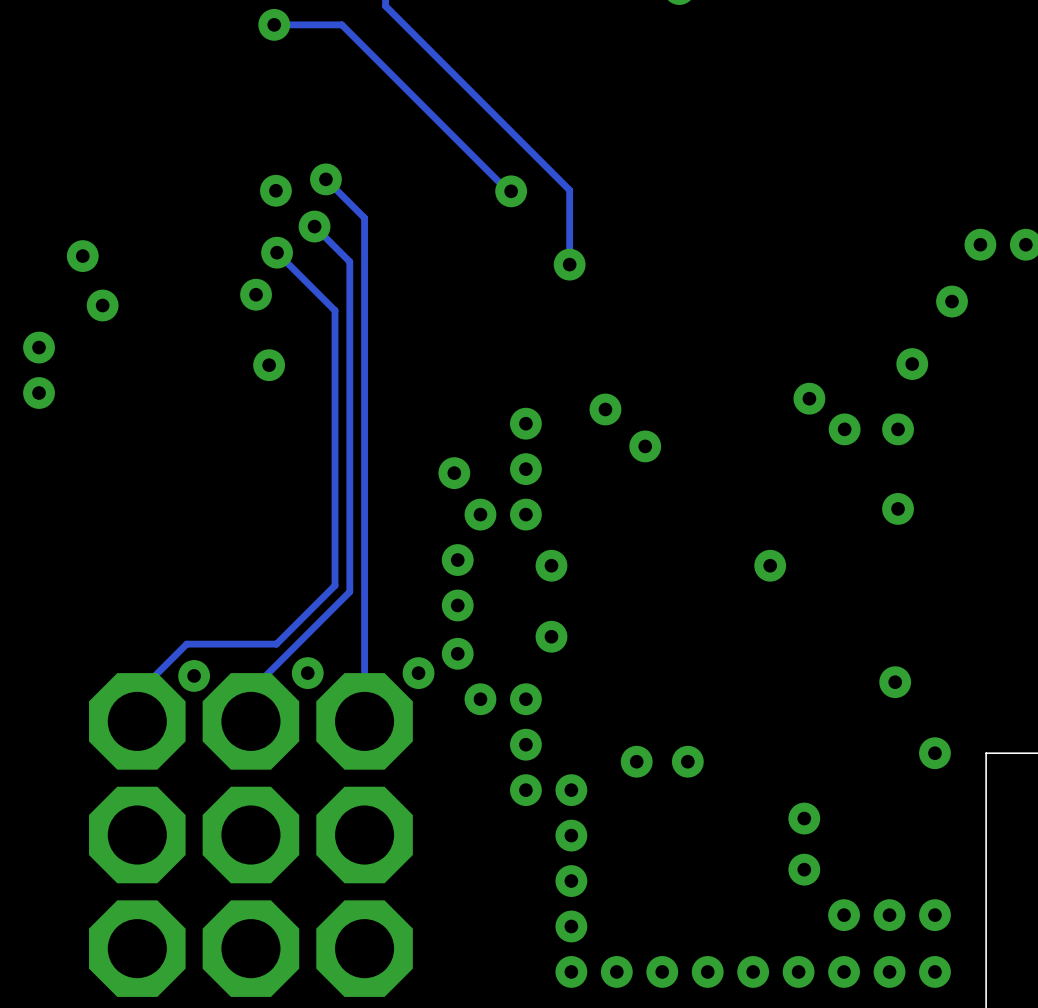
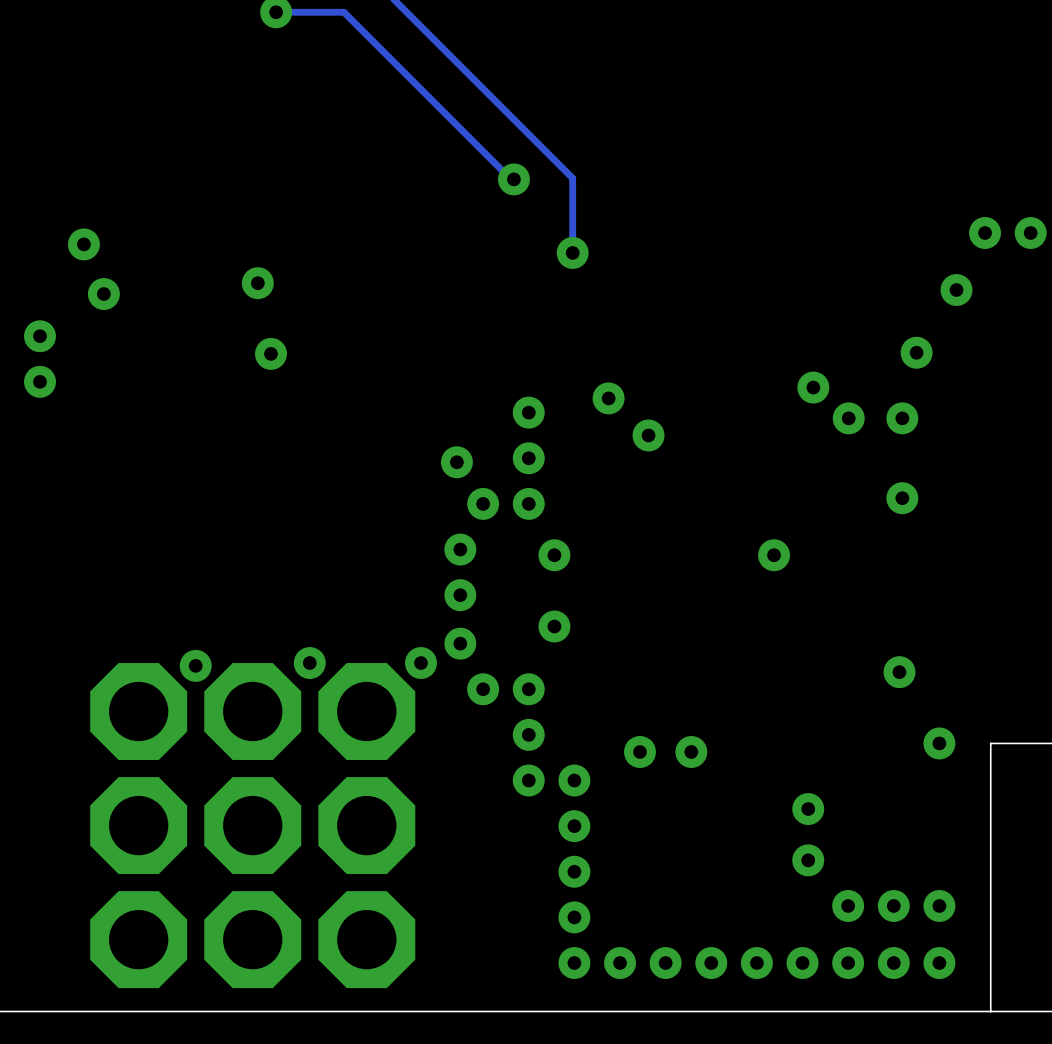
track: (325, 179) (364, 218) (364, 721) -> none
via: (325, 179) -> none
via: (275, 190) -> none
track: (314, 226) (349, 261) (349, 591) (250, 690) (250, 721) -> none
via: (314, 226) -> none
track: (277, 252) (335, 310) (335, 585) (276, 644) (186, 644) (137, 693) (137, 721) -> none
via: (277, 252) -> none

